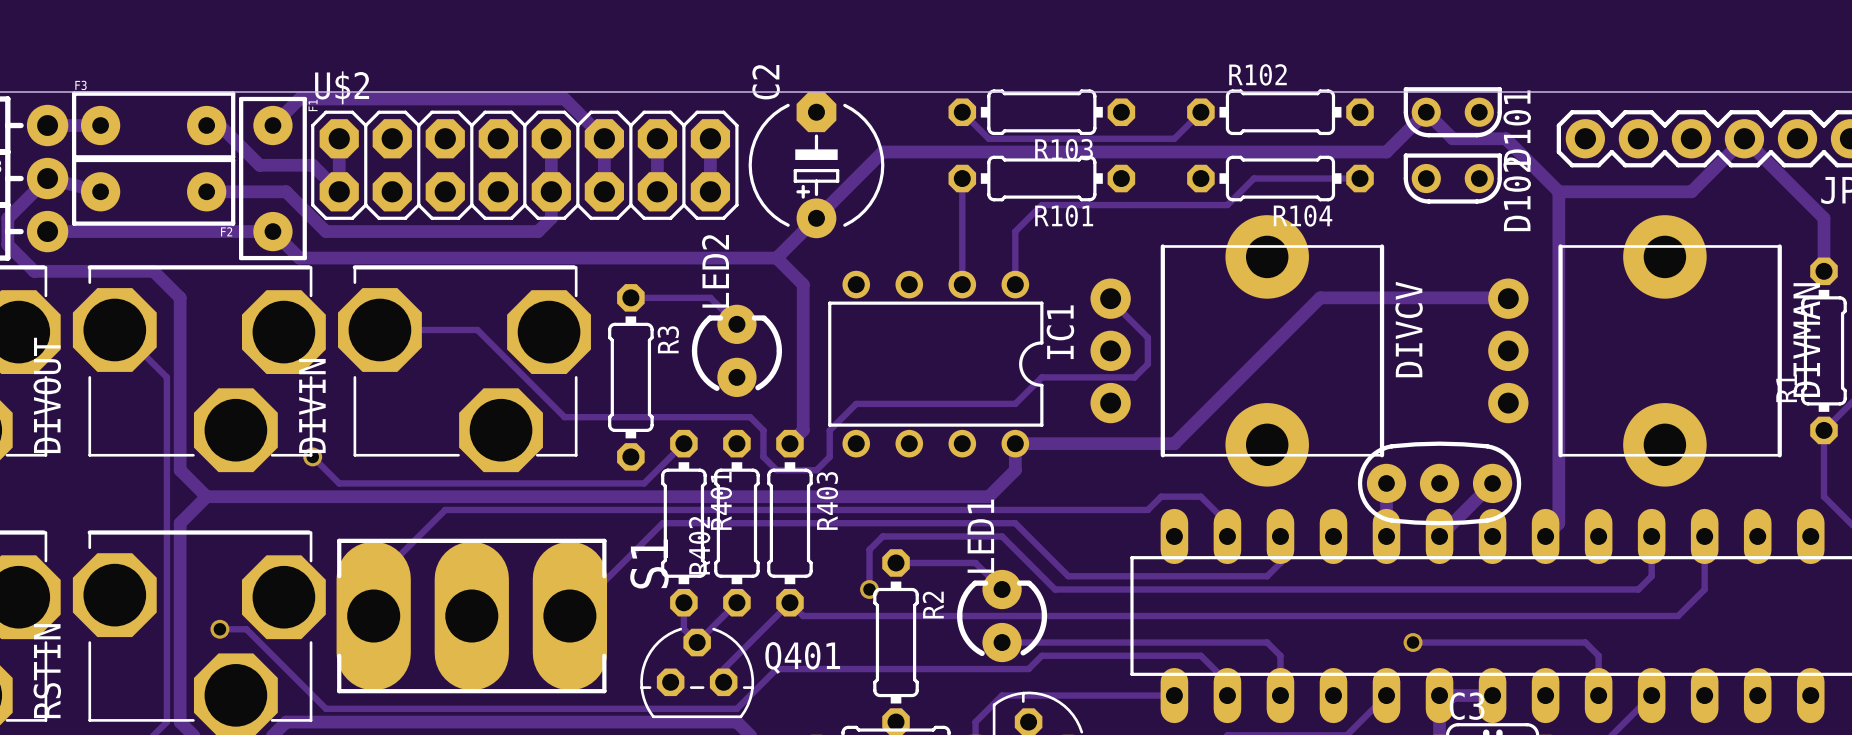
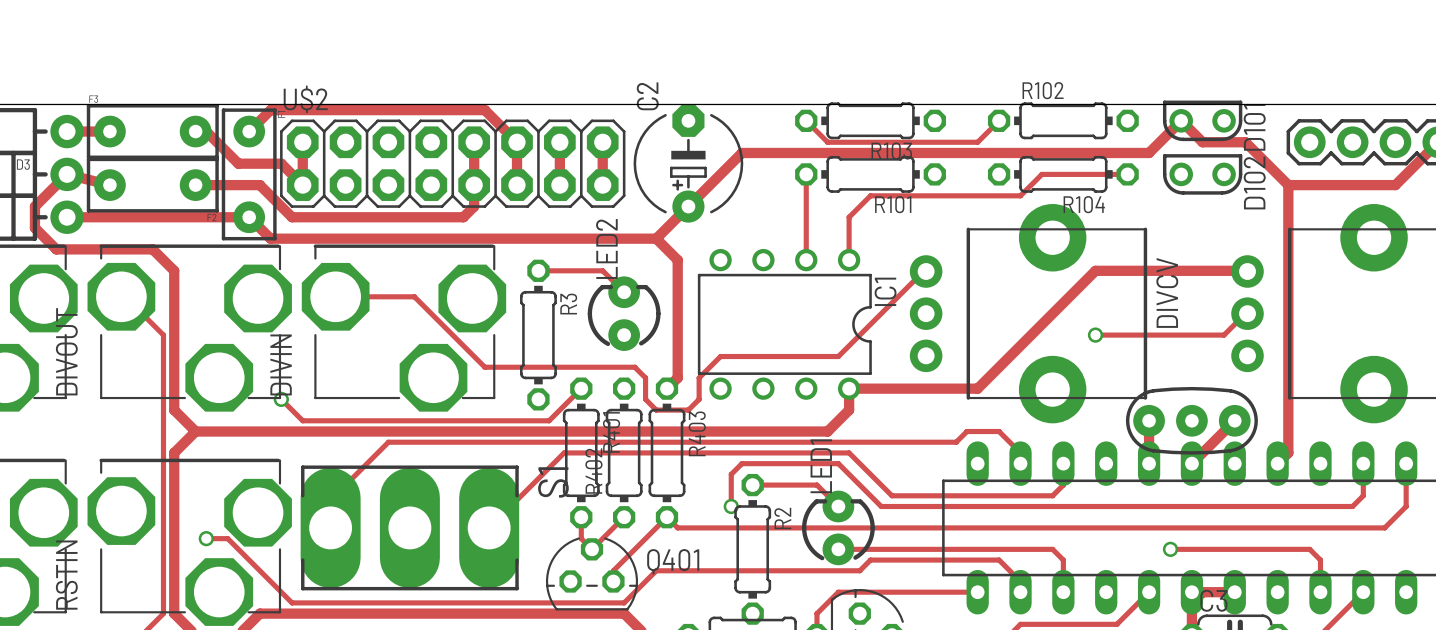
track: (1110, 298) (1147, 337) (1147, 364) (1134, 377) (1041, 377) (1015, 403) (1002, 403) -> (926, 271) (923, 271) (838, 356)
track: none -> (1247, 313) (1224, 335) (1095, 335)
via: none -> (1095, 335)

